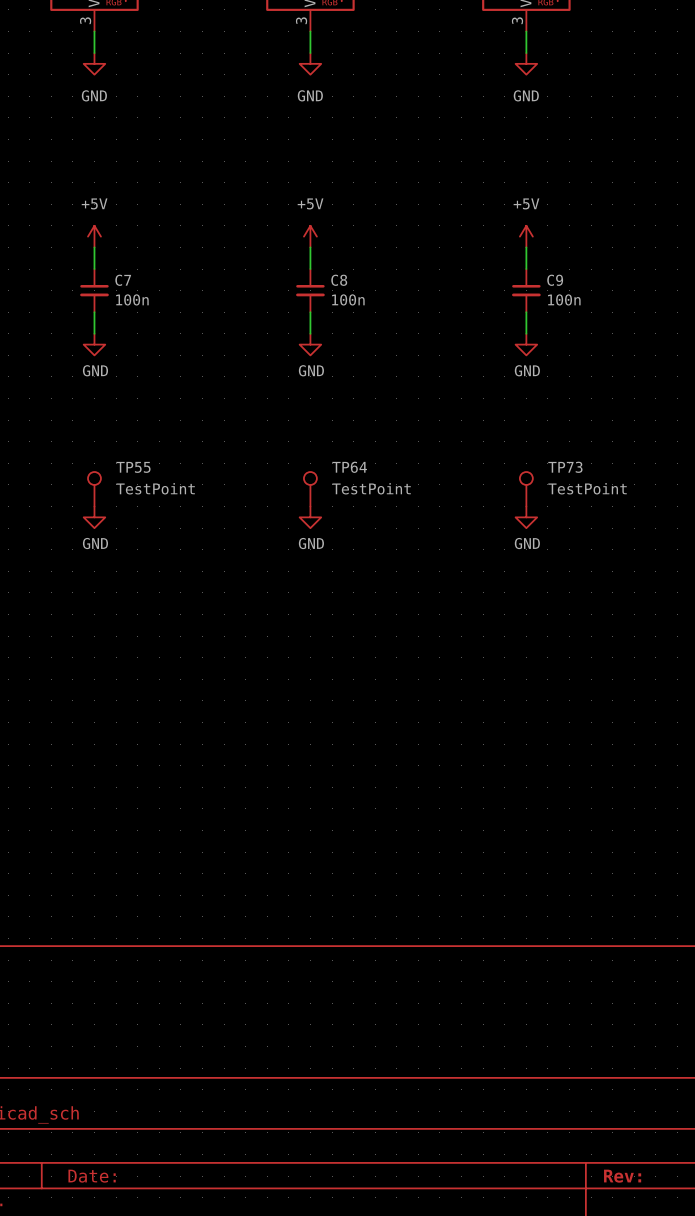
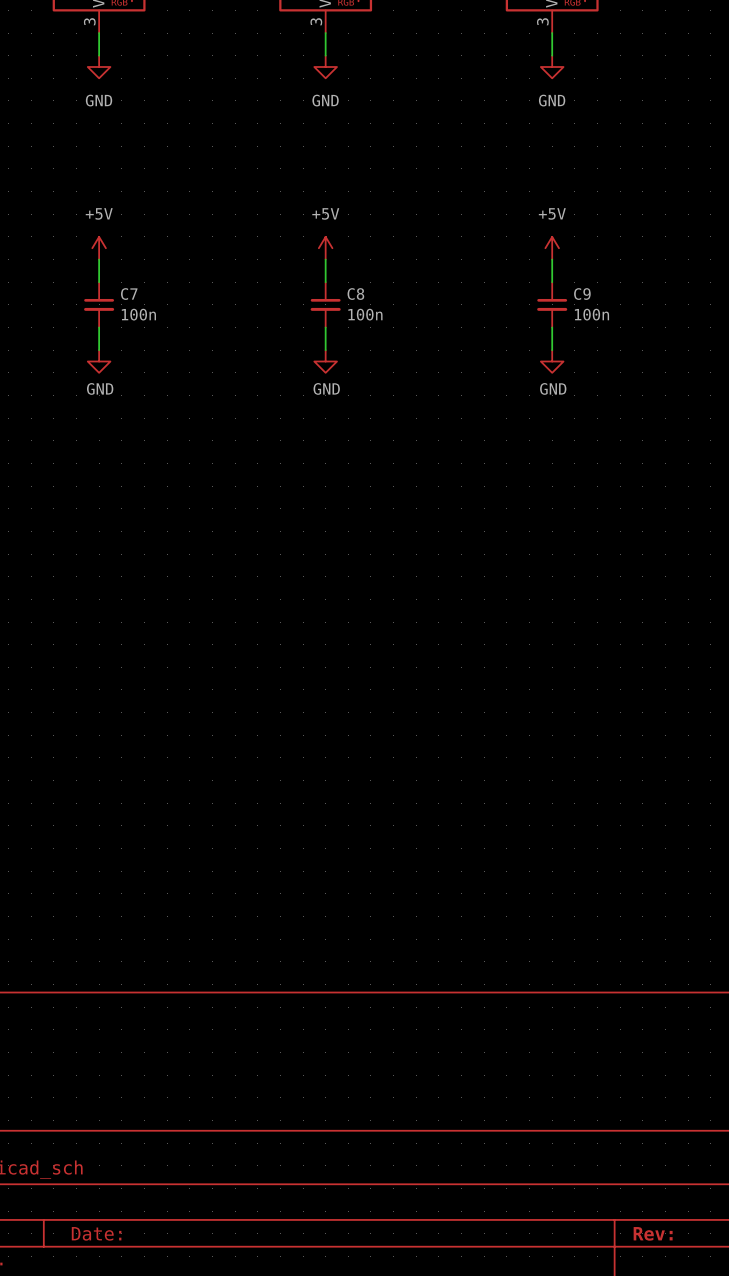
TP55: TestPoint (94, 489) -> none
TP64: TestPoint (310, 489) -> none
TP73: TestPoint (526, 489) -> none
power symbol: GND (94, 517) -> none
power symbol: GND (310, 517) -> none
power symbol: GND (526, 517) -> none

